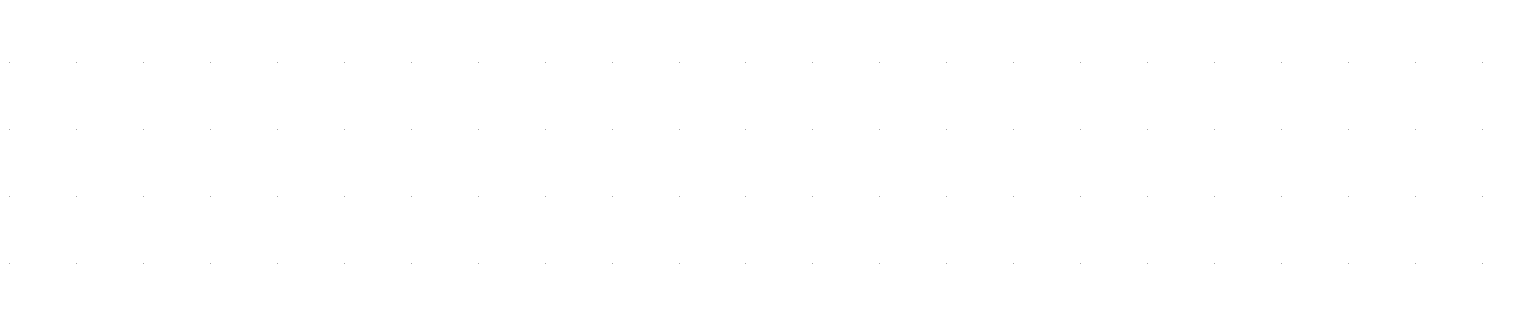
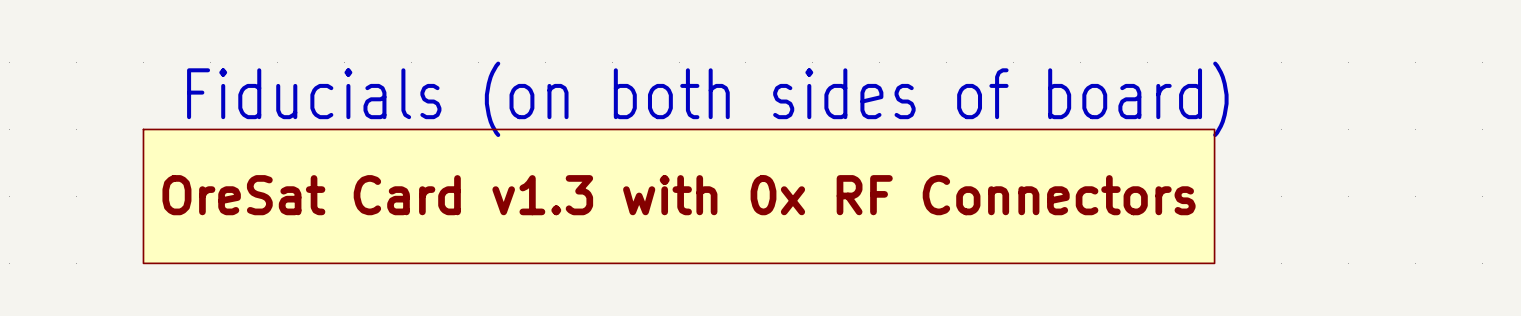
text: none -> Fiducials (on both sides of board) (707, 99)
part: none -> (679, 196)

